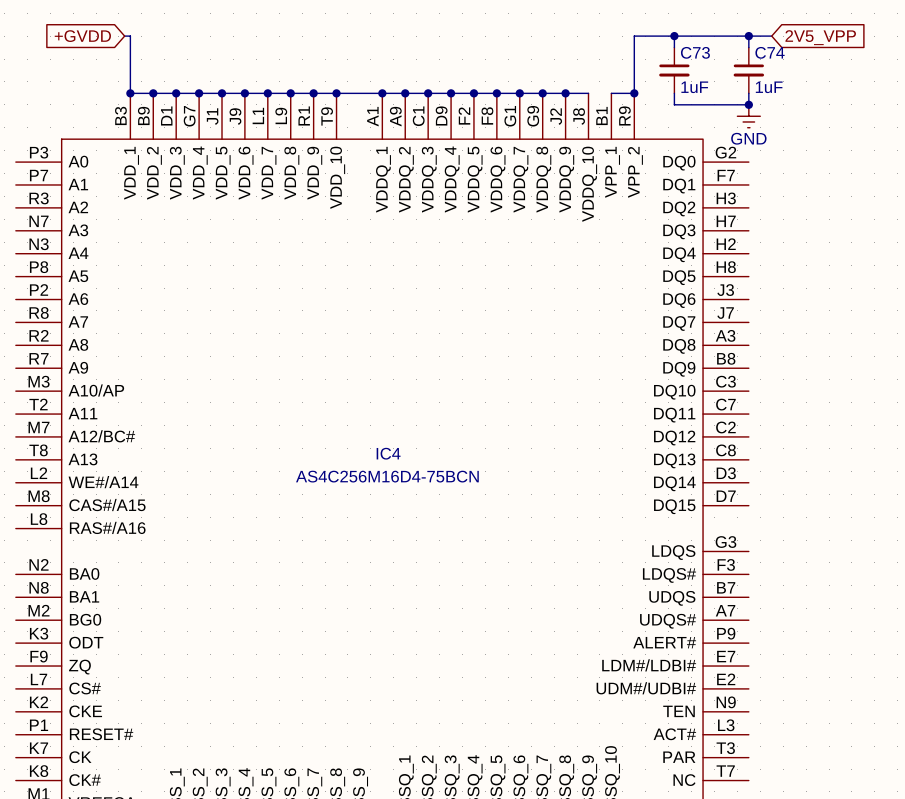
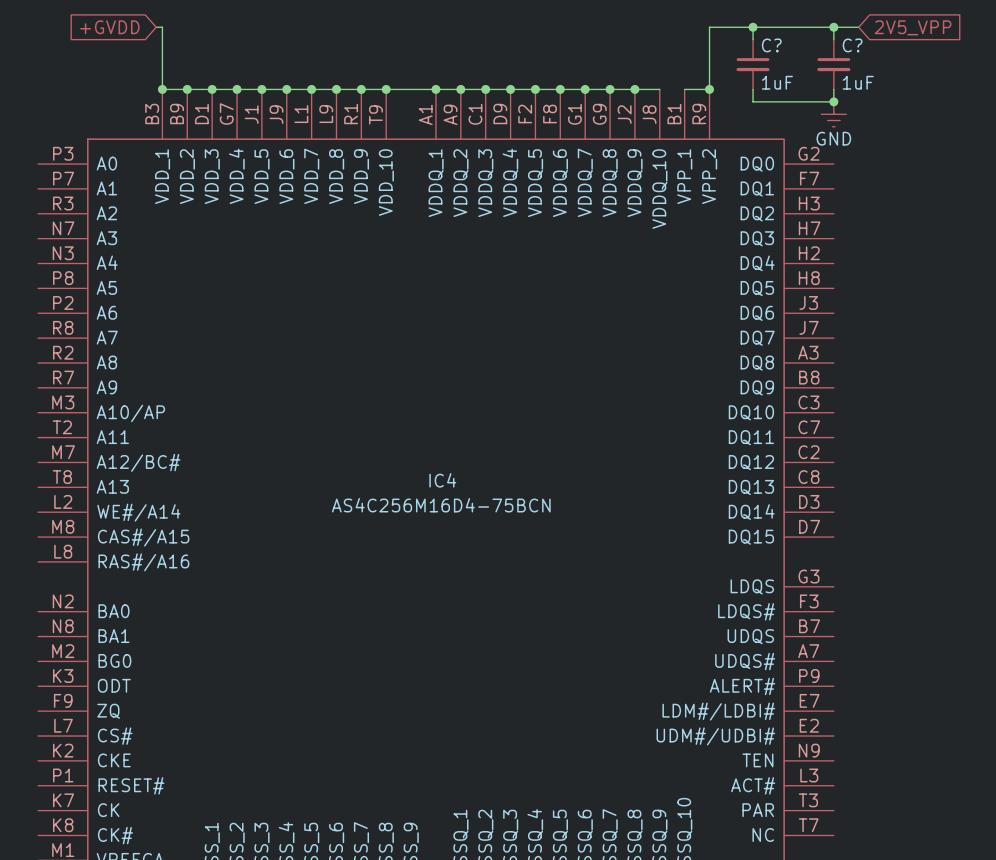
C73 name: C73 (695, 52) -> C? (771, 45)
C74 name: C74 (770, 52) -> C? (852, 45)

